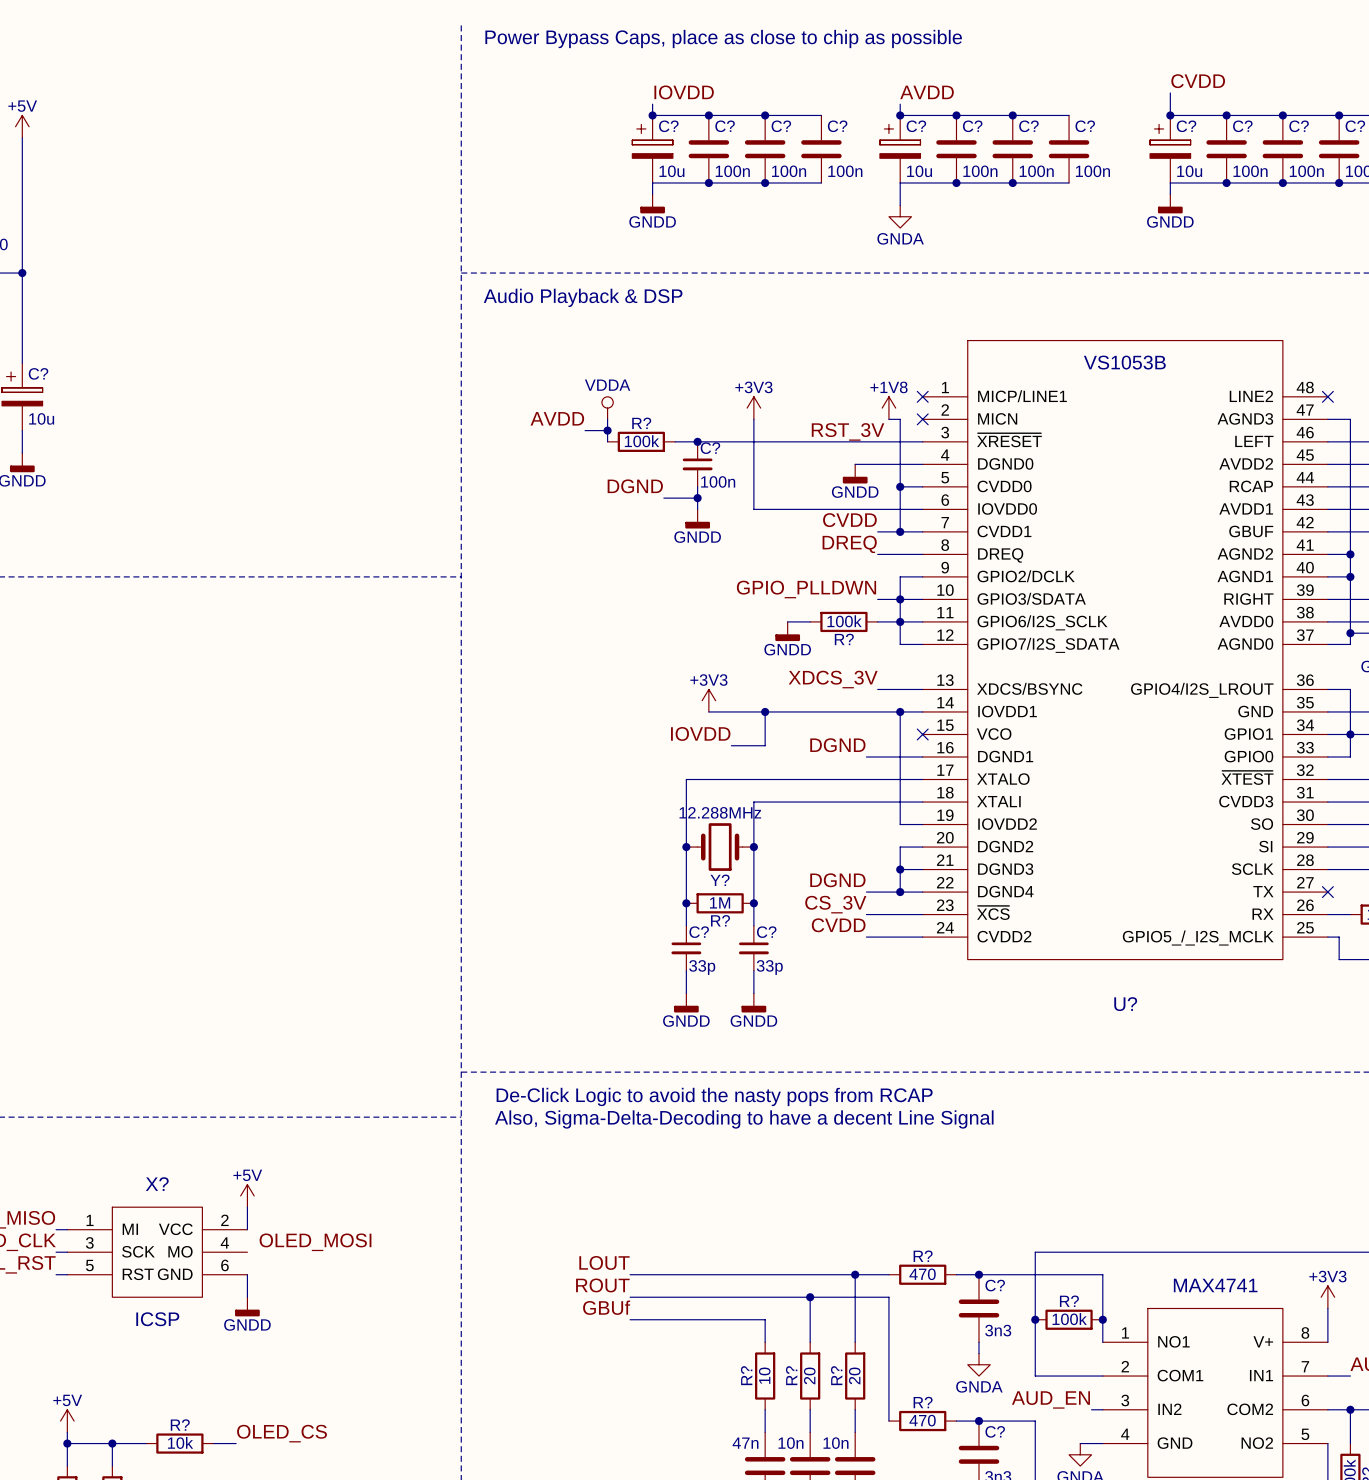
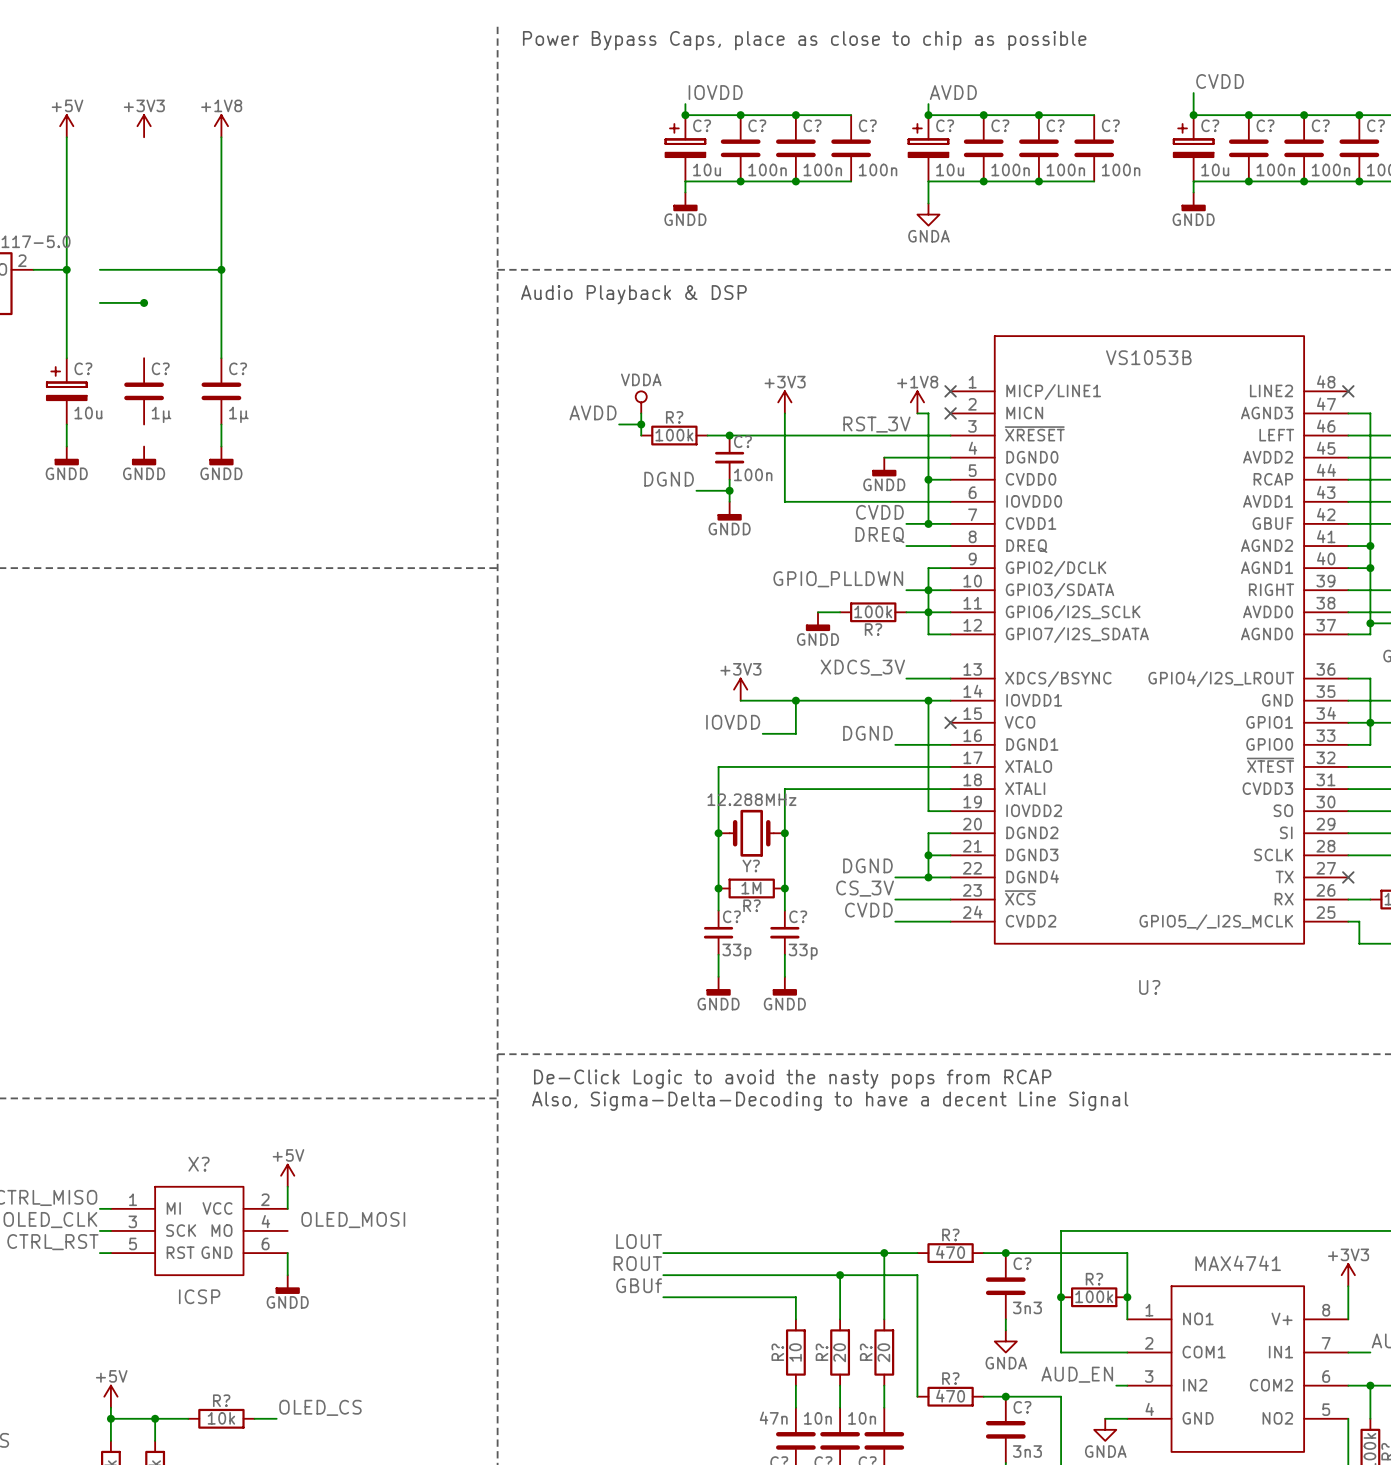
power symbol: none -> +3V3 (144, 126)
power symbol: none -> +1V8 (221, 126)
wire: none -> (221, 137) (221, 358)
wire: none -> (99, 269) (221, 269)
junction: none -> (221, 269)
wire: none -> (99, 302) (144, 302)
junction: none -> (144, 302)
C?: none -> 1µ (144, 391)
C?: none -> 1µ (221, 391)
wire: none -> (221, 424) (221, 446)
power symbol: none -> GNDD (144, 455)
power symbol: none -> GNDD (221, 455)

